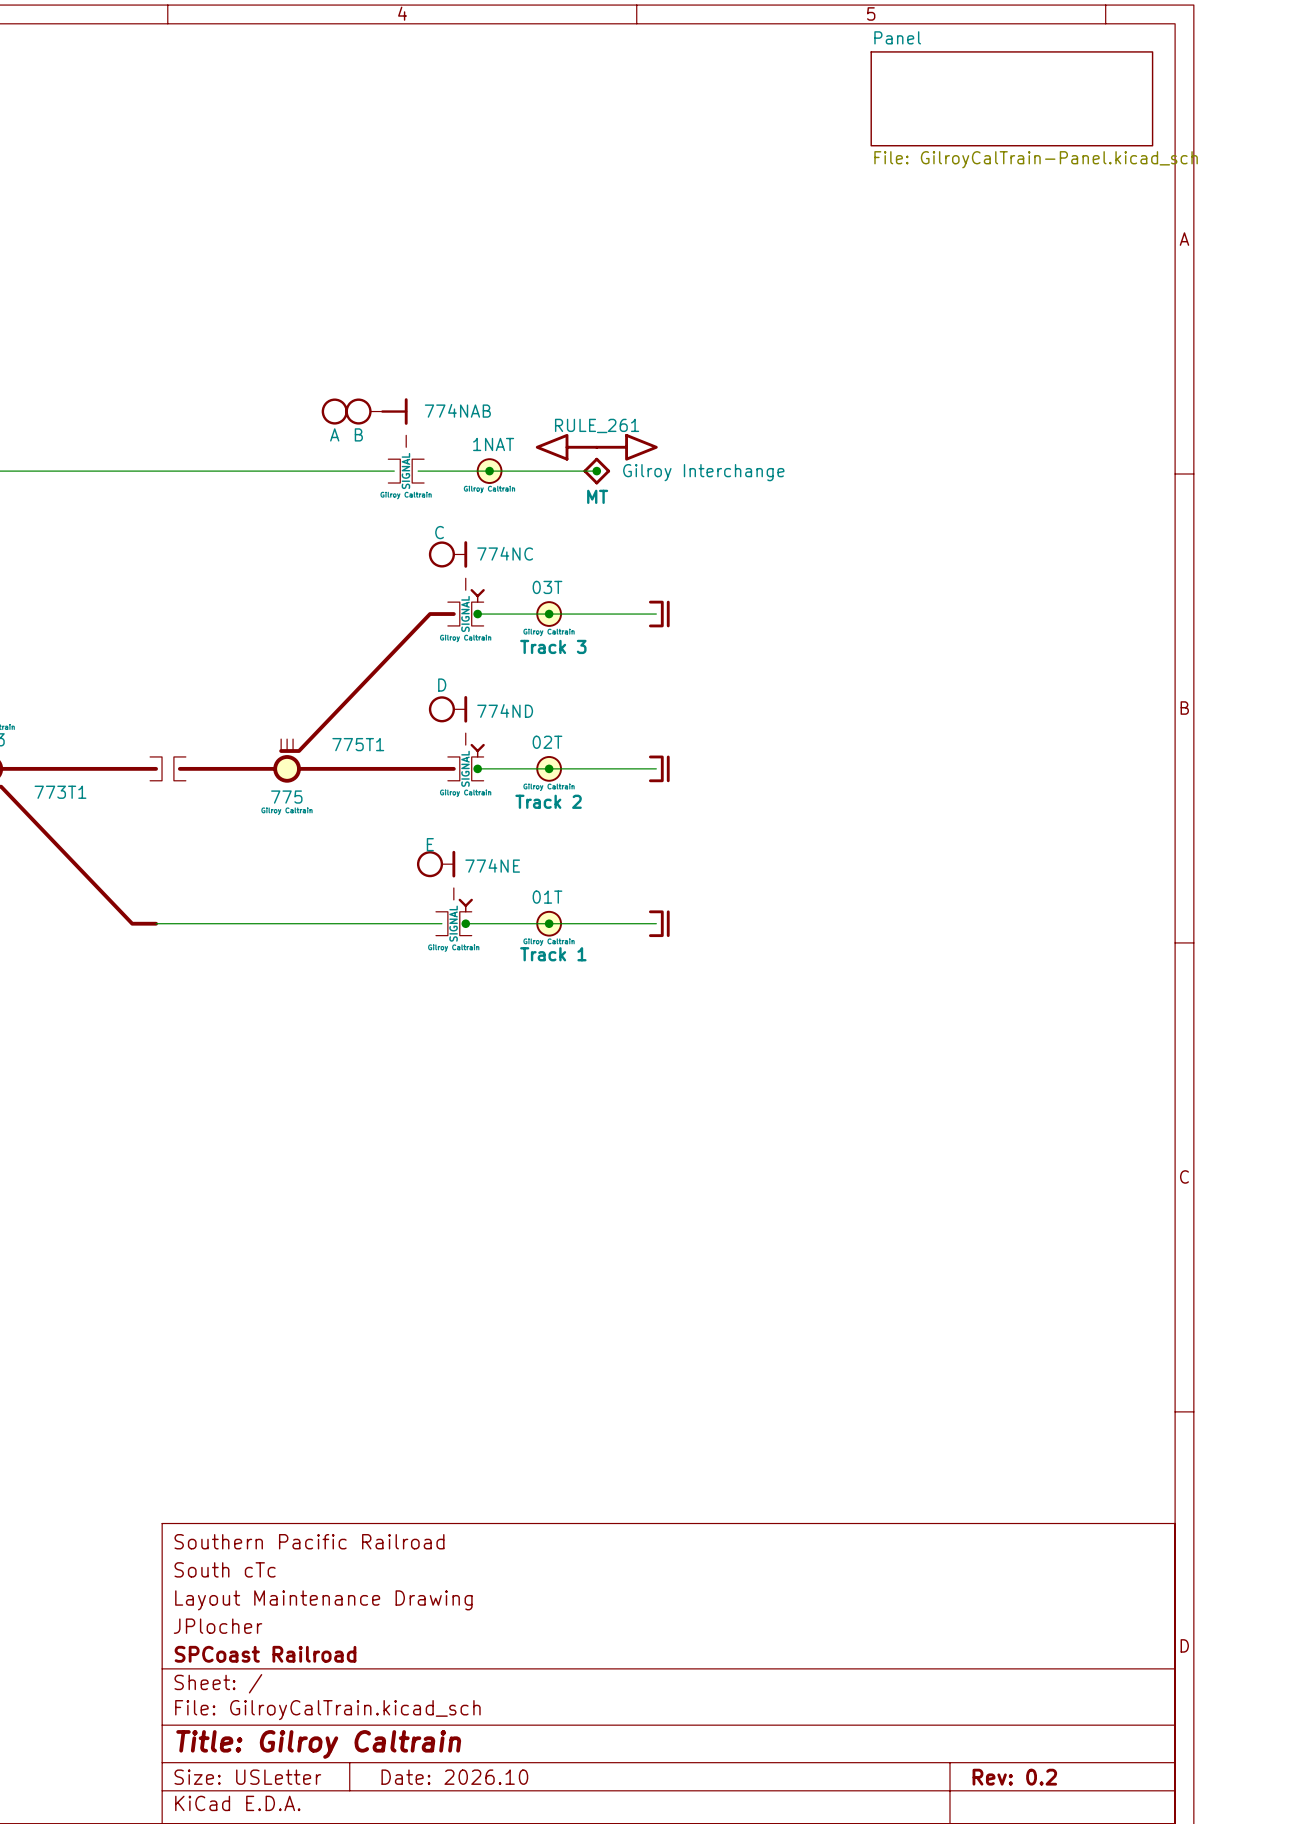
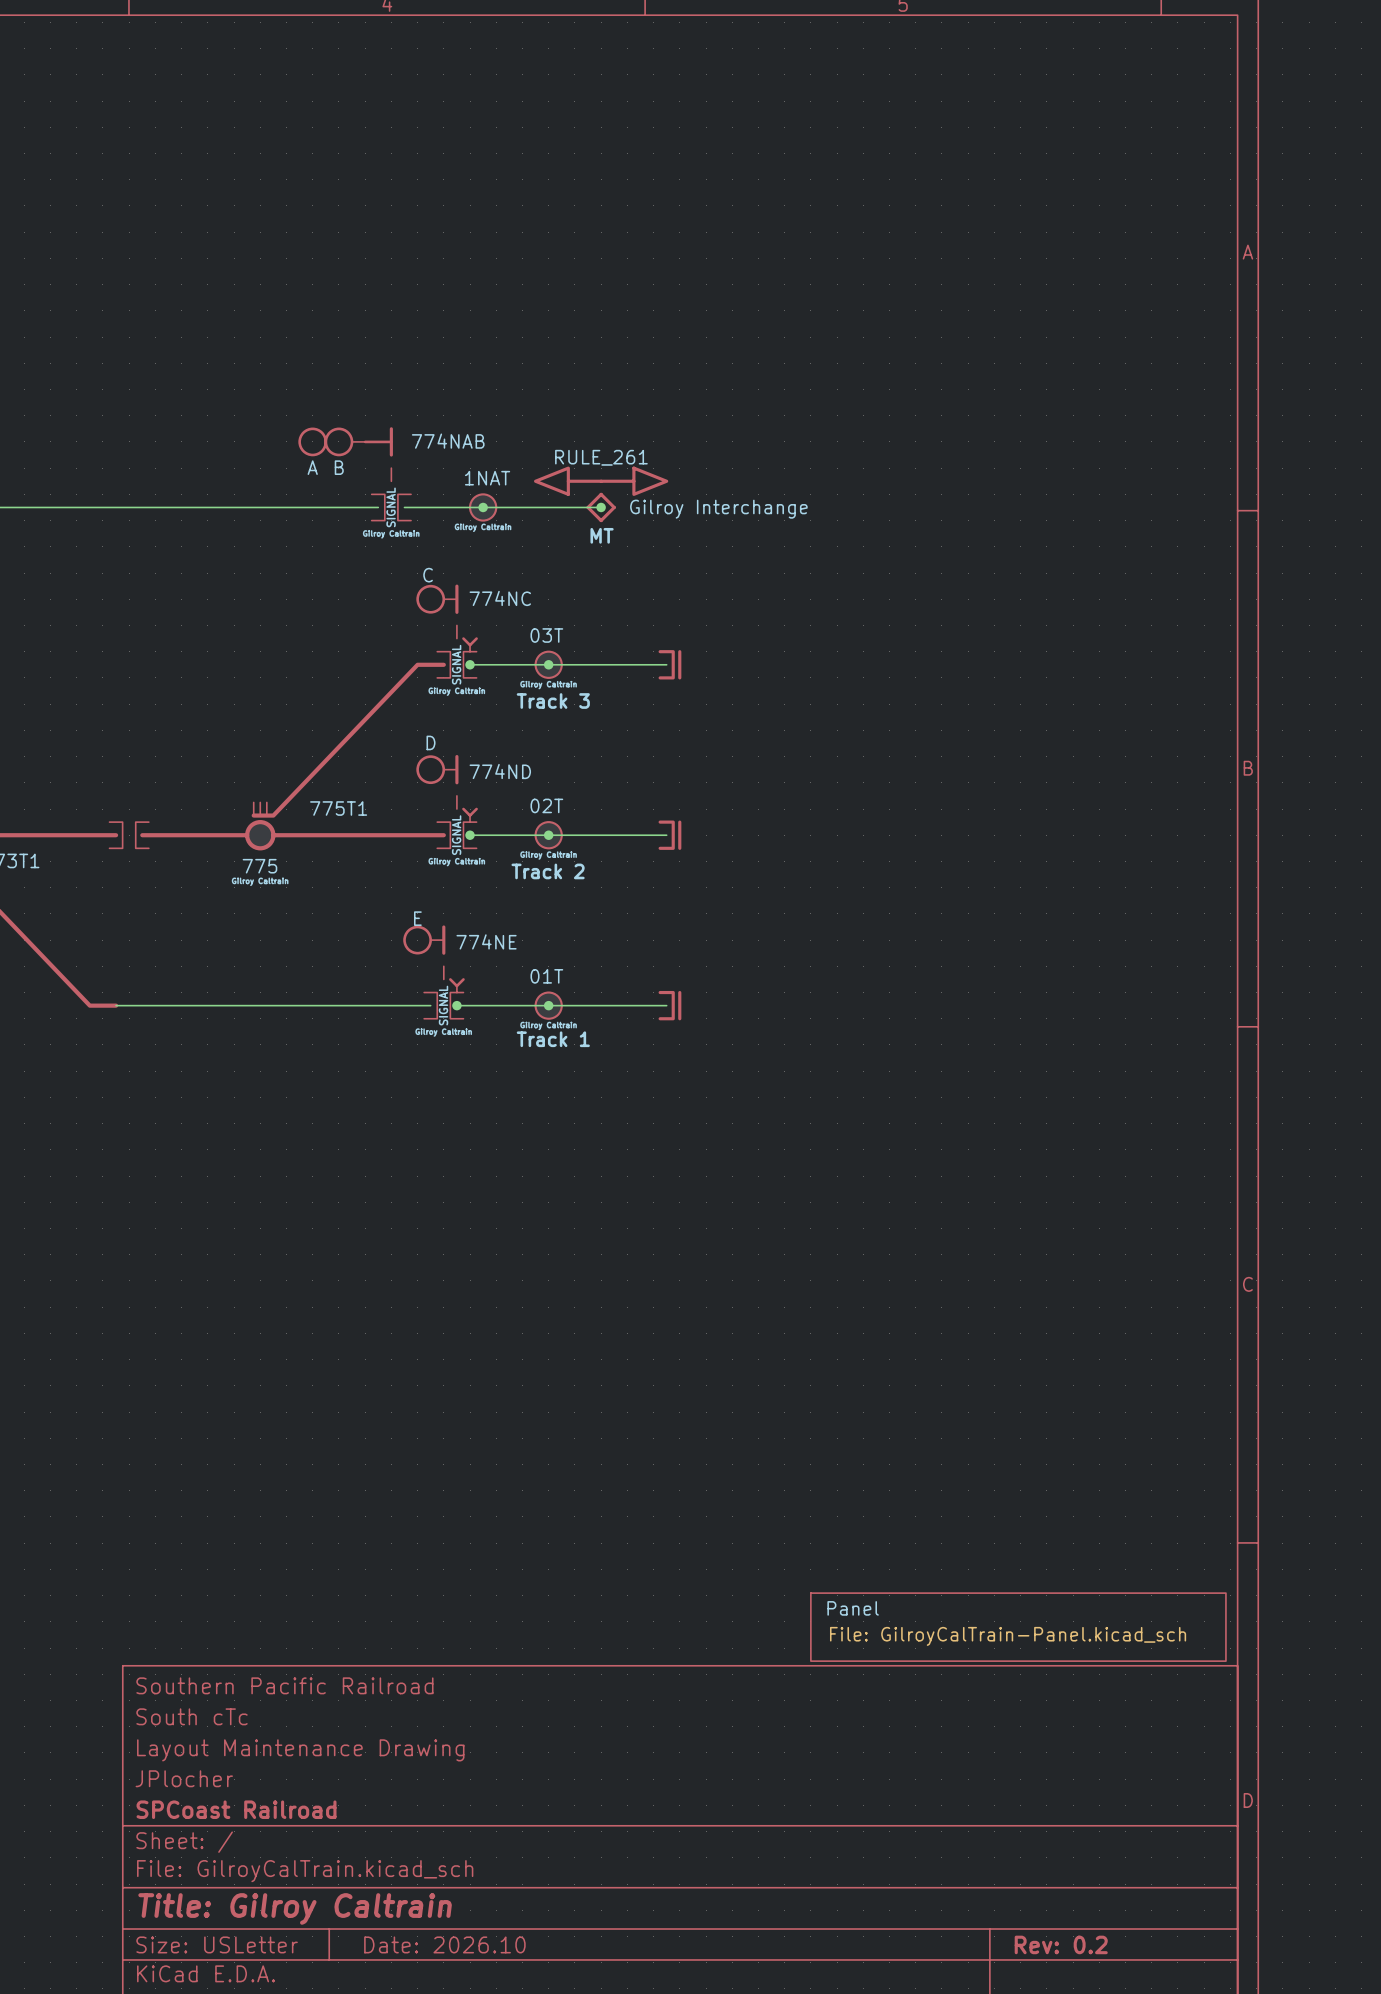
sheet Panel: File: GilroyCalTrain-Panel.kicad_sch (1011, 98) -> none
sheet Panel: none -> File: GilroyCalTrain-Panel.kicad_sch (1018, 1627)

